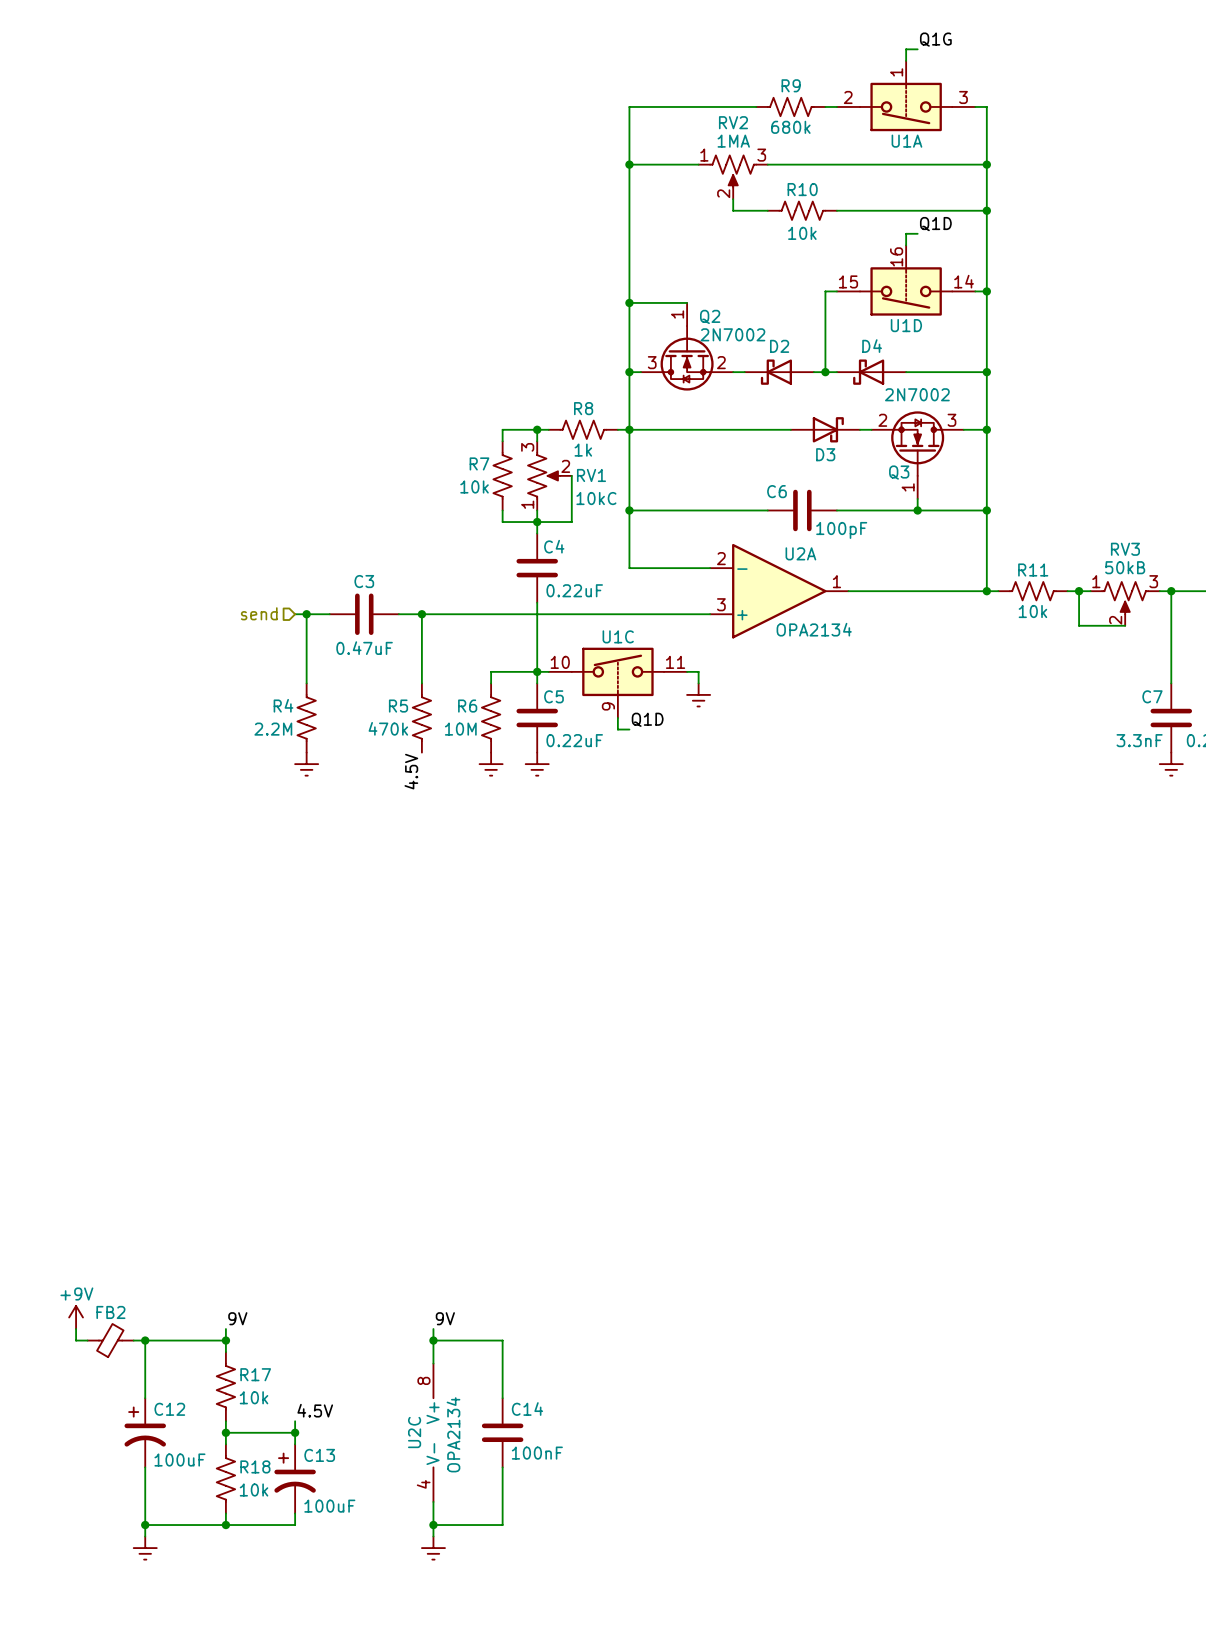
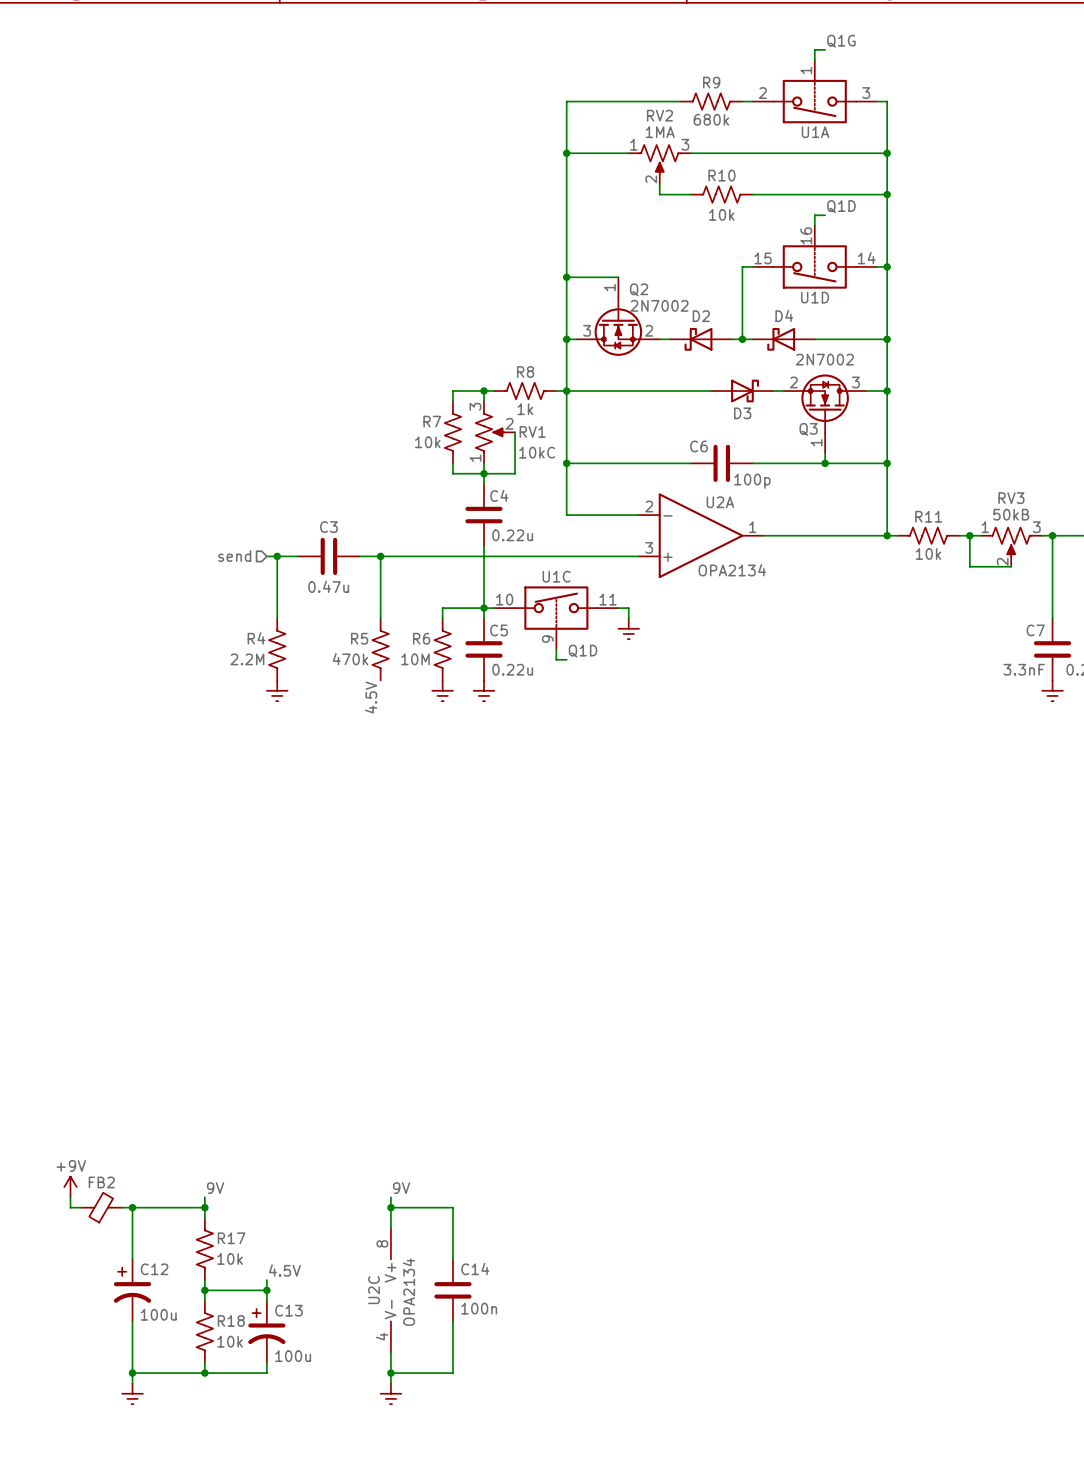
C6 value: 100pF (841, 530) -> 100p (752, 481)
C4 value: 0.22uF (574, 590) -> 0.22u (512, 535)
C3 value: 0.47uF (364, 648) -> 0.47u (328, 586)
C5 value: 0.22uF (574, 740) -> 0.22u (512, 669)
C14 value: 100nF (537, 1453) -> 100n (479, 1308)
C12 value: 100uF (179, 1460) -> 100u (158, 1314)
C13 value: 100uF (329, 1506) -> 100u (293, 1356)

